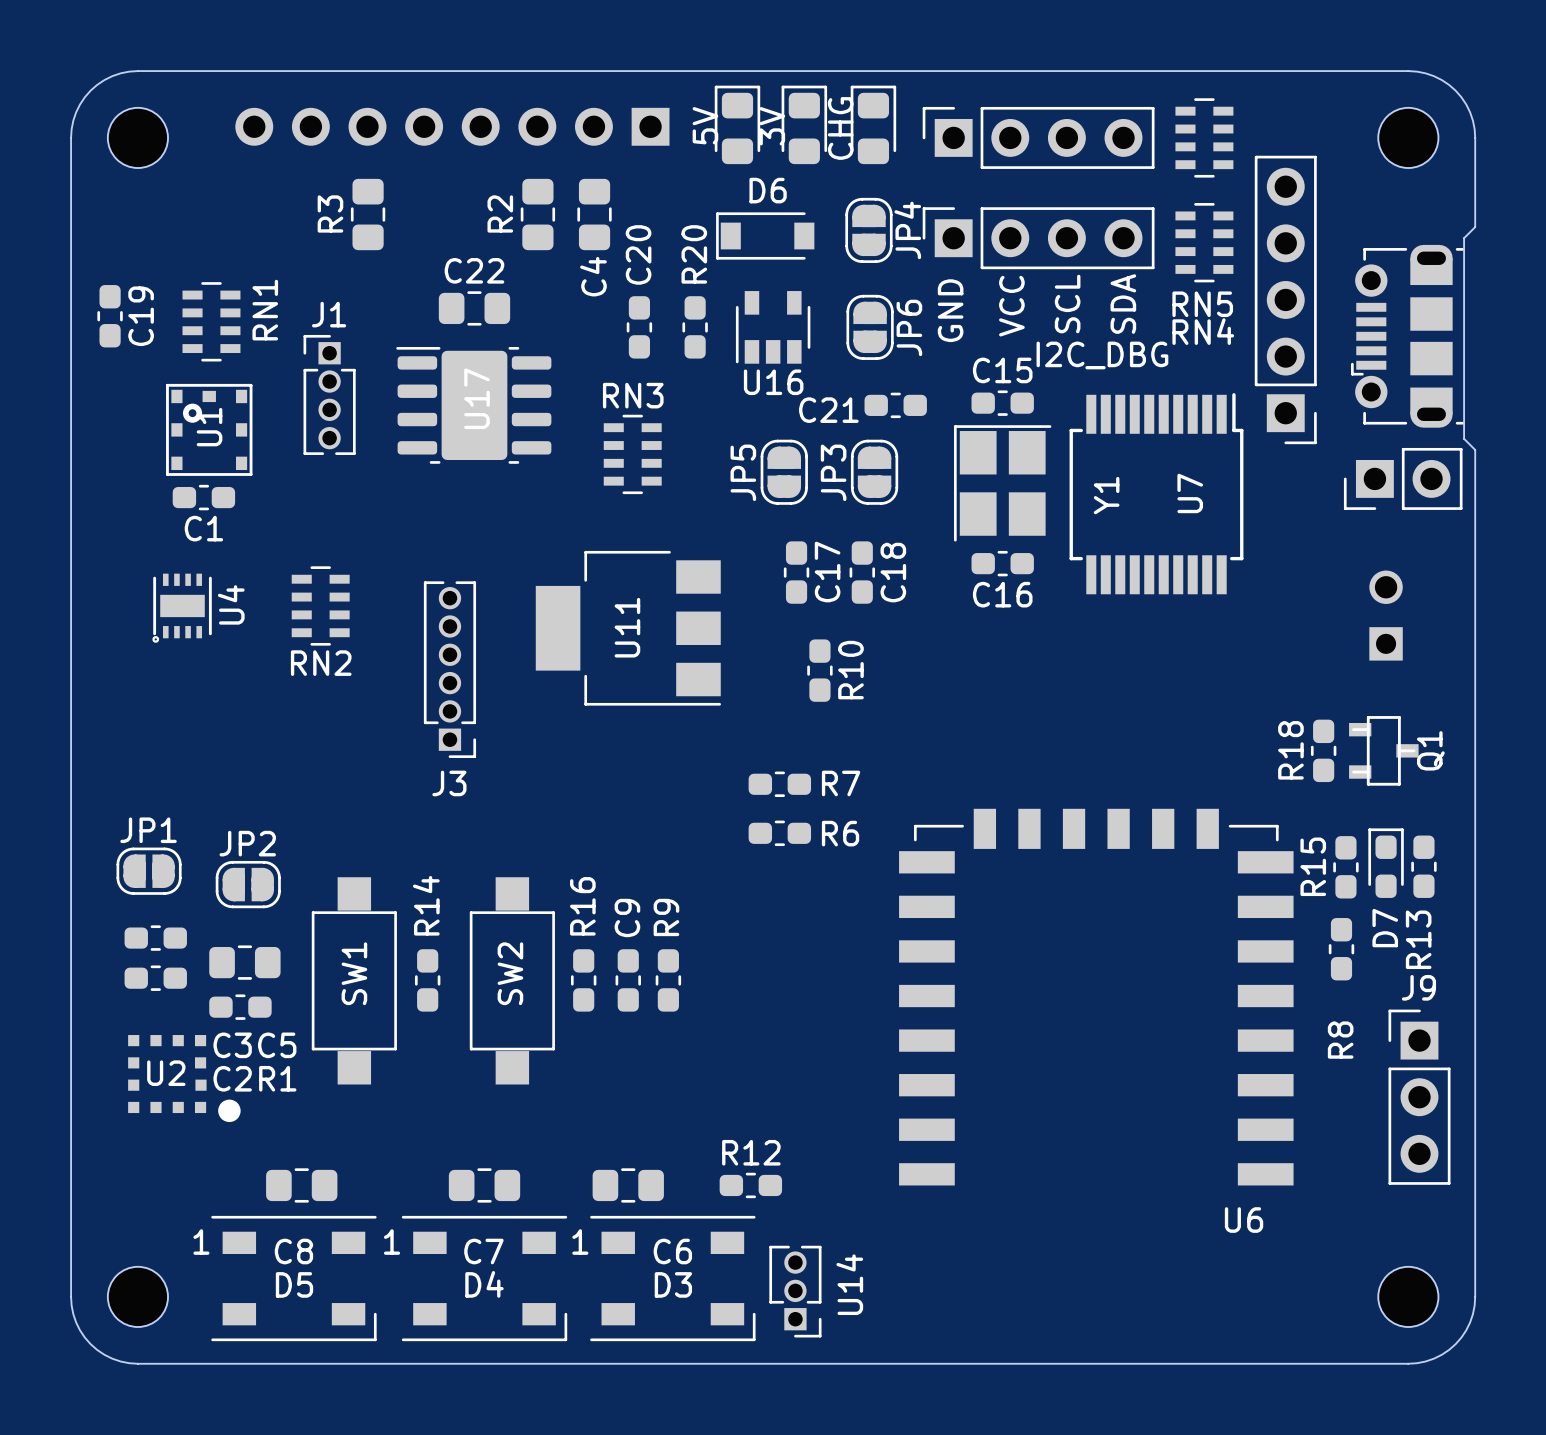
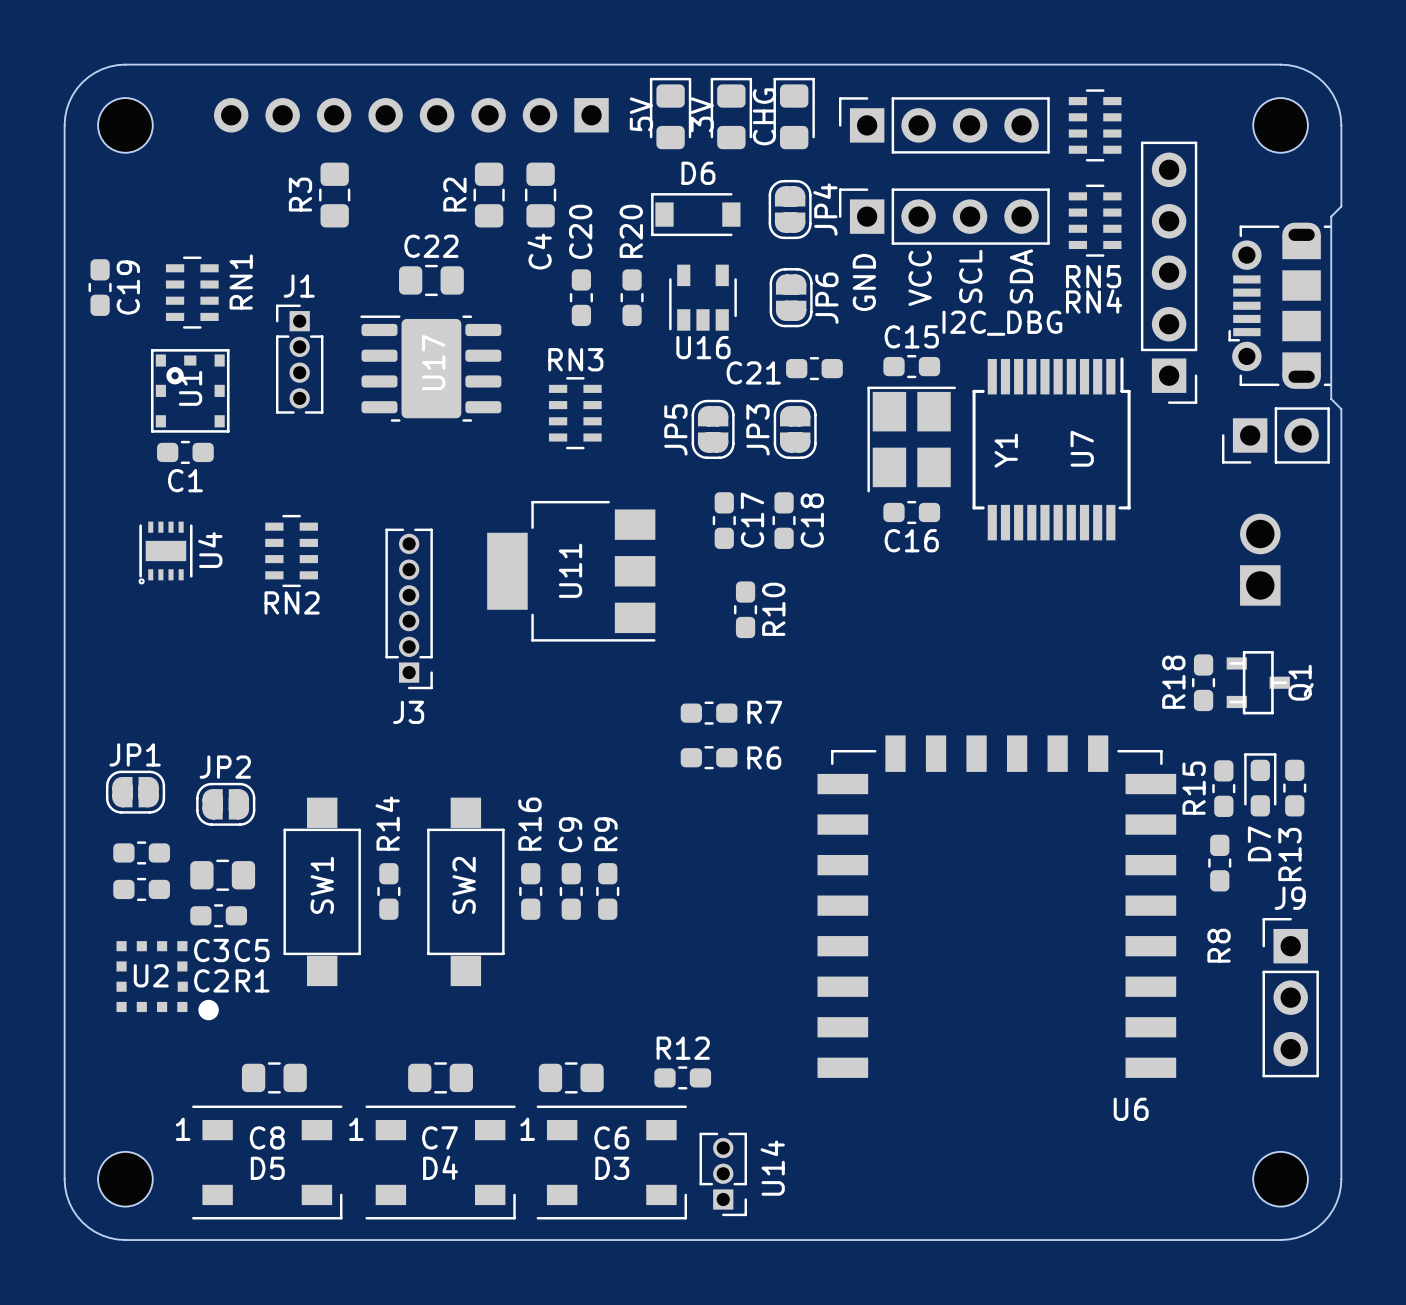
part footprint: [1369, 570, 1403, 661] -> [1240, 513, 1281, 606]

